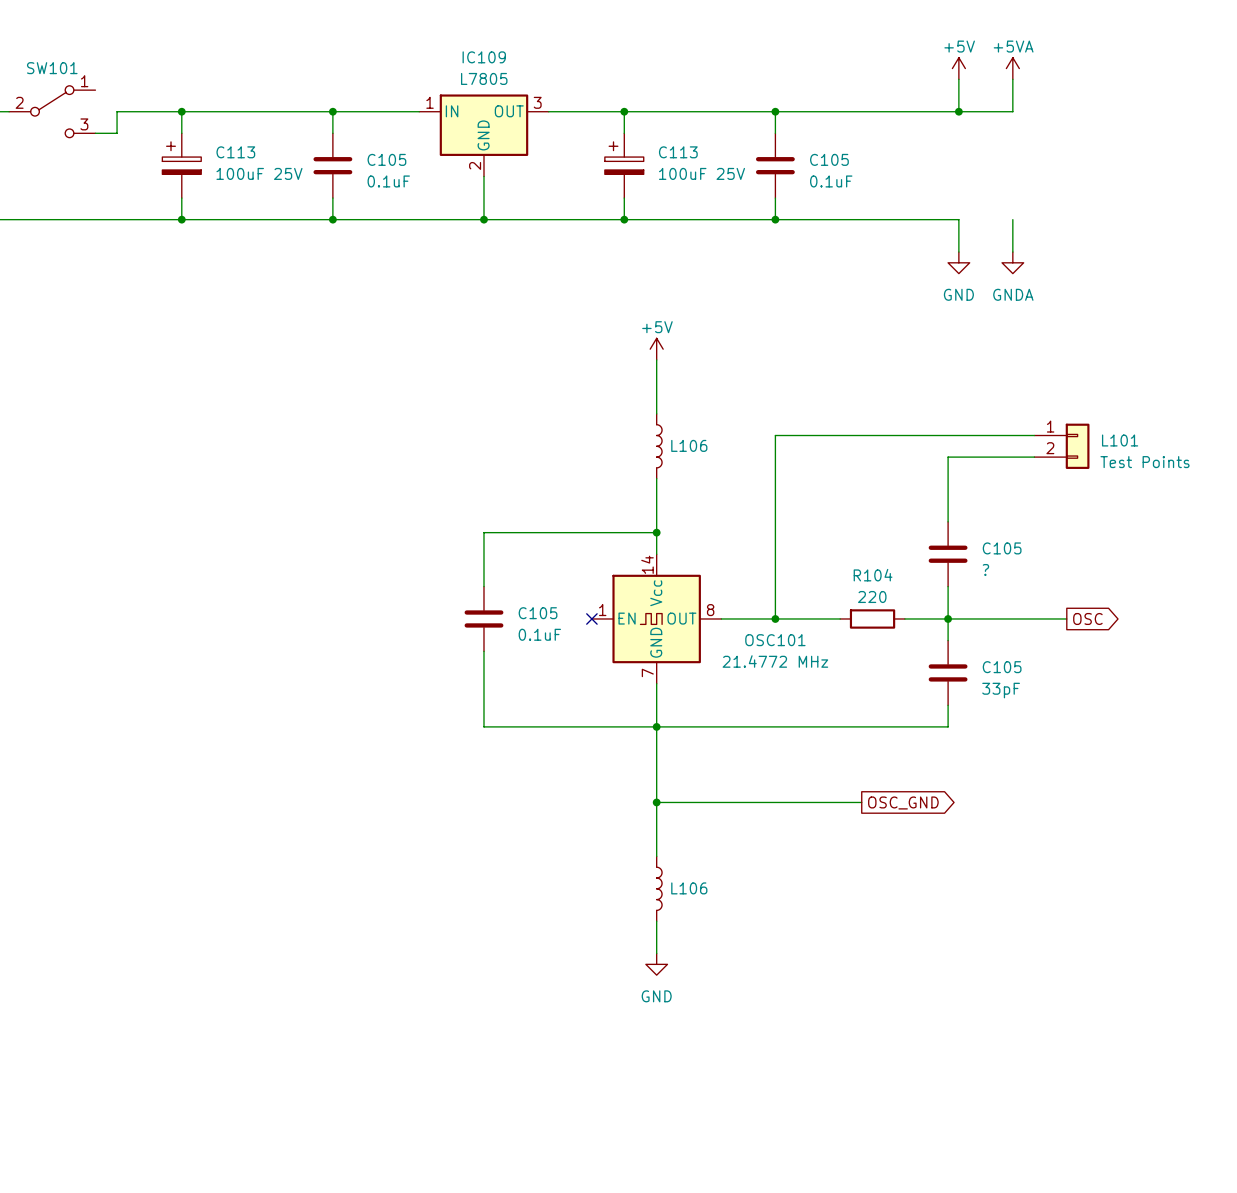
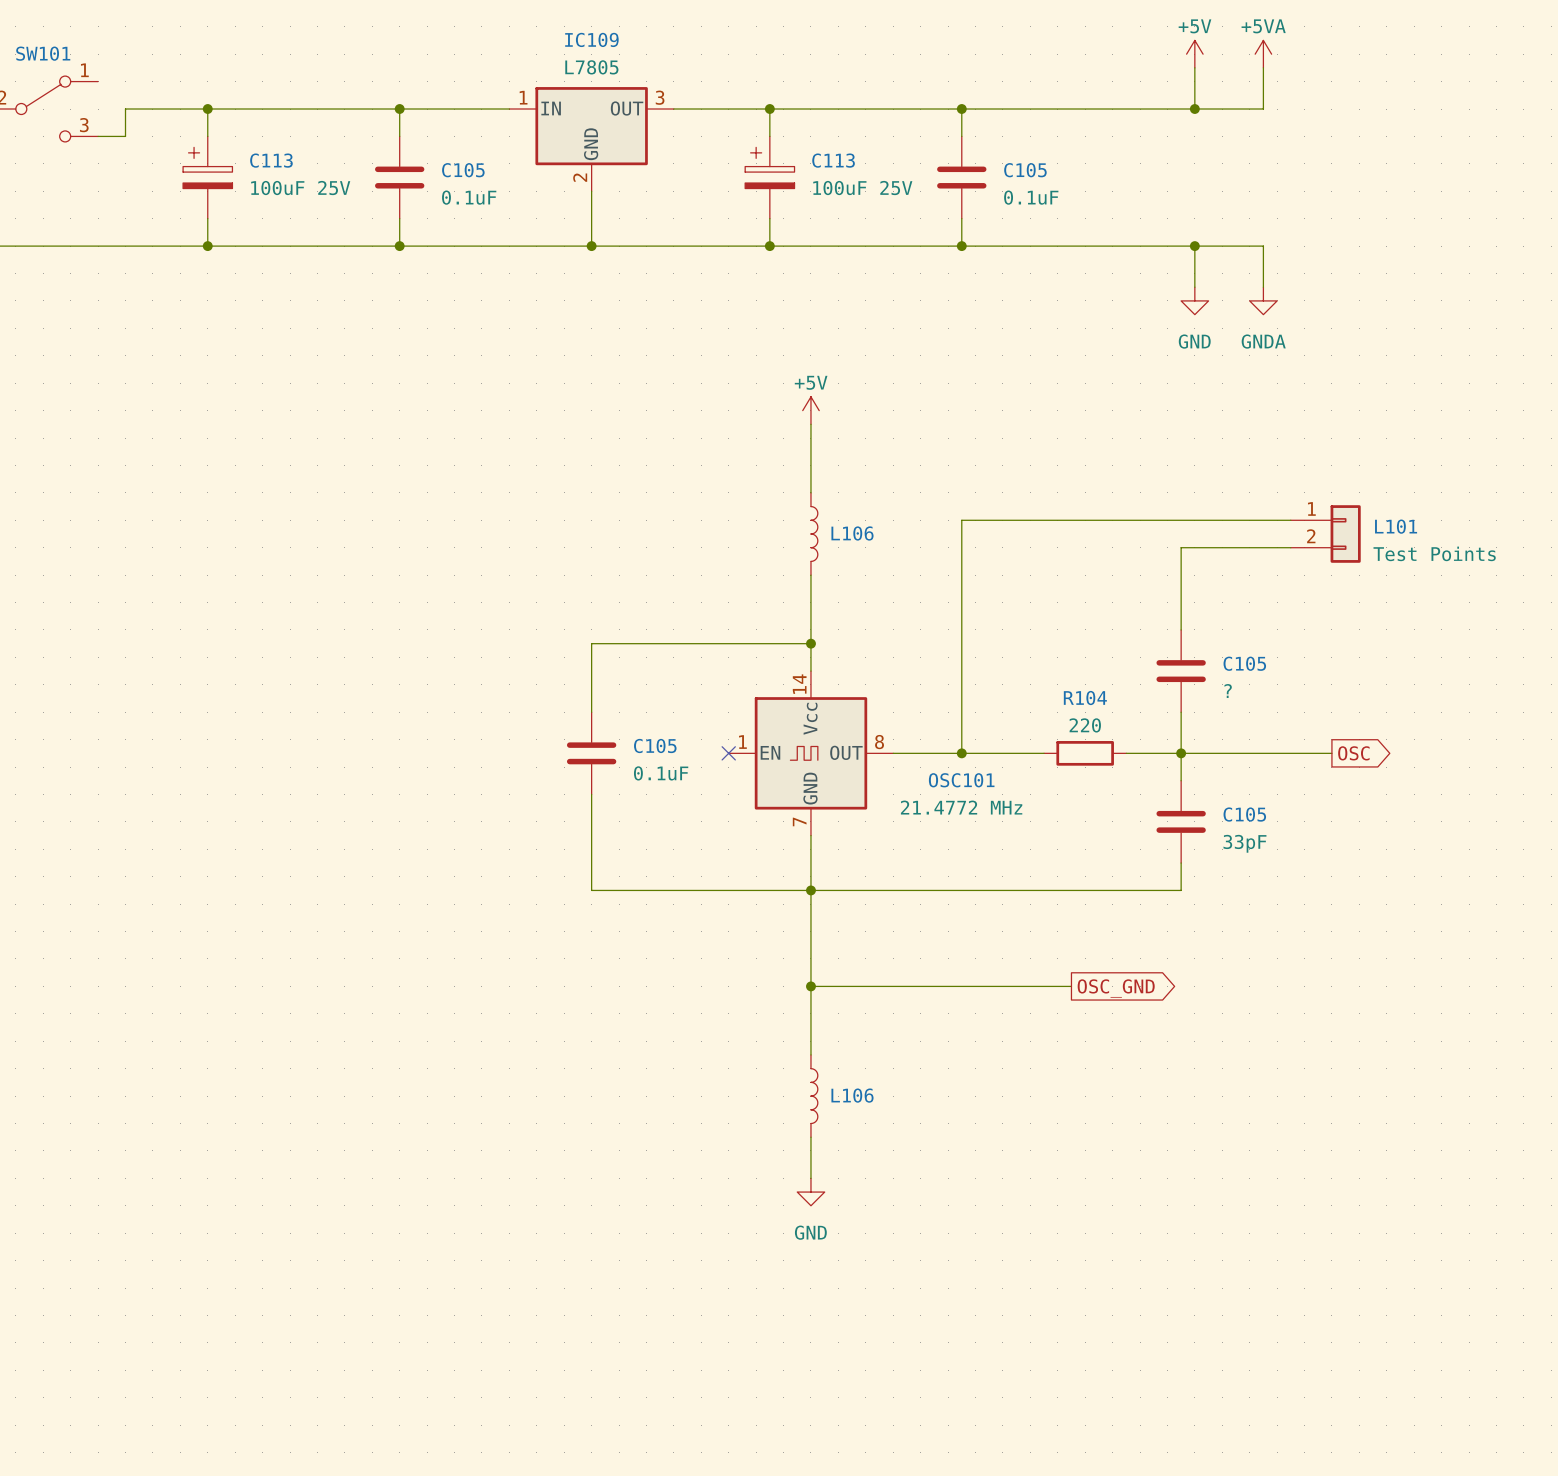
wire: none -> (1194, 246) (1263, 246)
junction: none -> (1194, 246)

